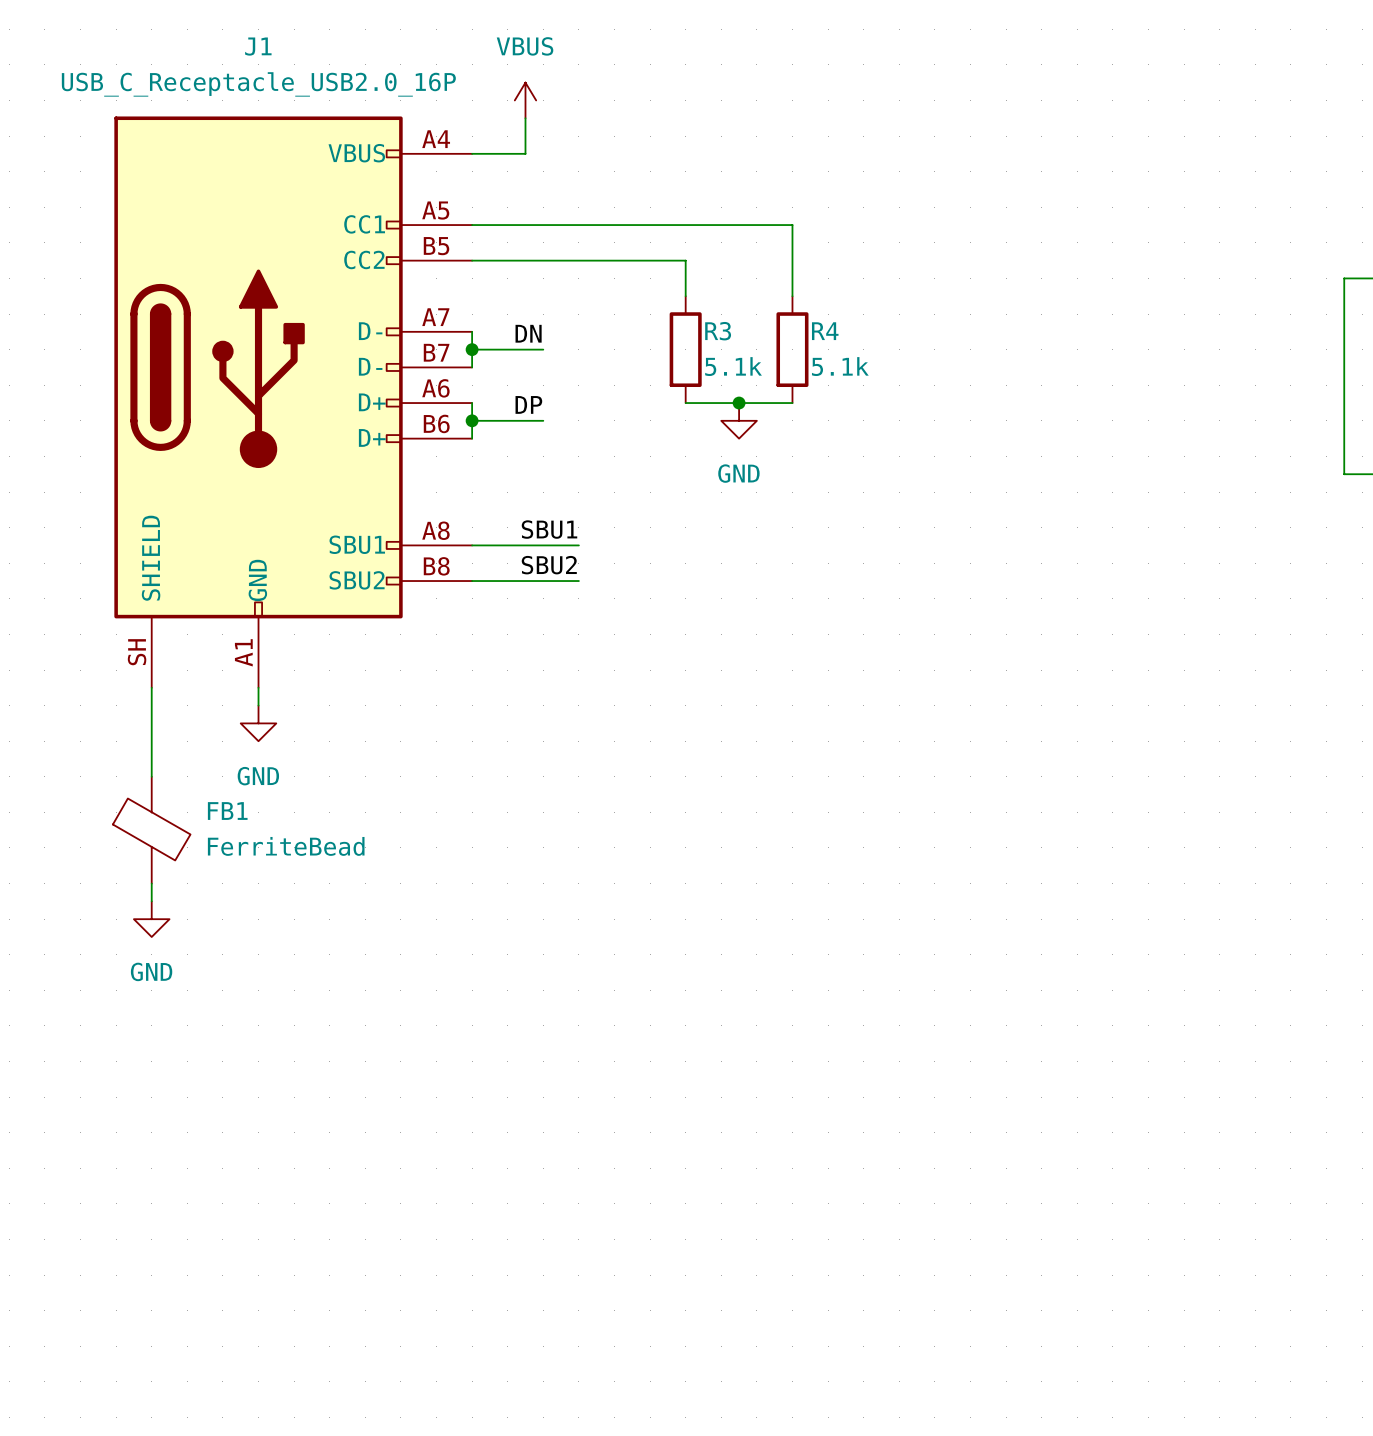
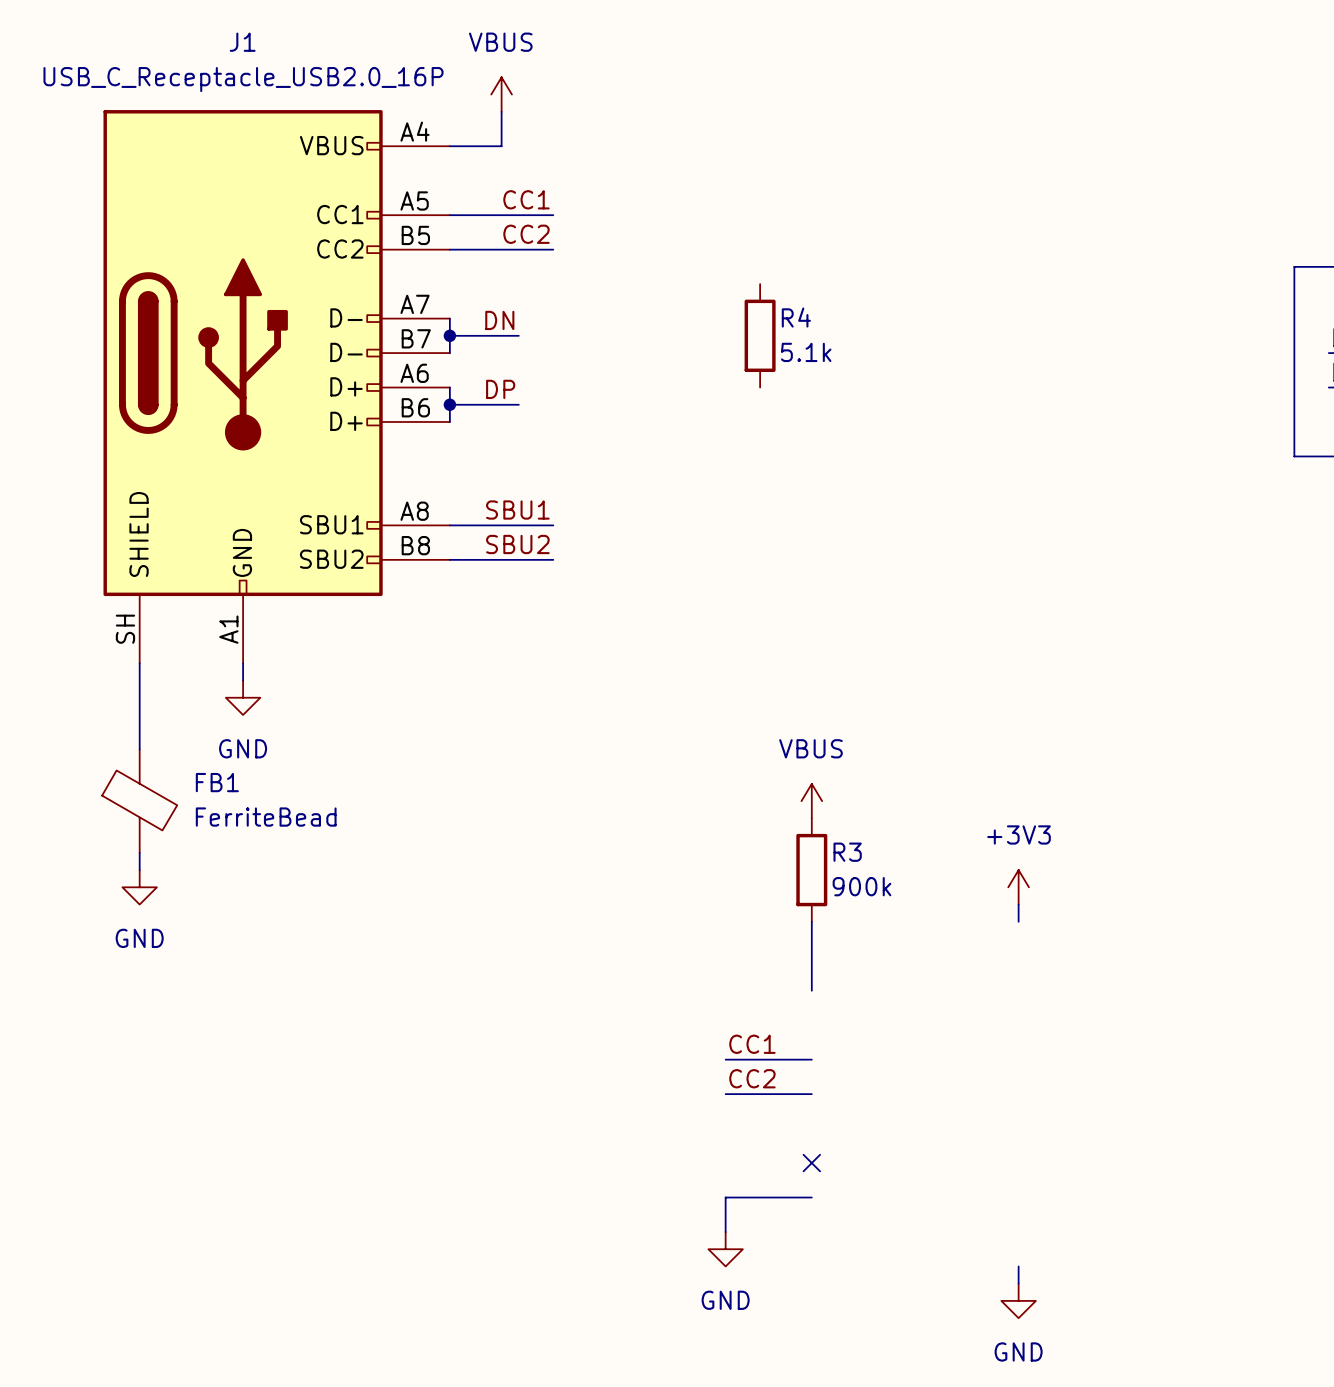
label: none -> CC1 (526, 199)
wire: (578, 225) (792, 225) (792, 296) -> none
label: none -> CC2 (526, 234)
wire: (578, 260) (685, 260) (685, 296) -> none
R3 position: (685, 349) -> (811, 870)
R3 value: 5.1k (733, 366) -> 900k (862, 886)
wire: (685, 403) (792, 403) -> none
junction: (739, 403) -> none
power symbol: GND (739, 420) -> none
power symbol: none -> VBUS (811, 801)
power symbol: none -> +3V3 (1018, 887)
wire: none -> (1018, 904) (1018, 921)
wire: none -> (811, 921) (811, 990)
label: none -> CC1 (752, 1044)
wire: none -> (725, 1059) (811, 1059)
label: none -> CC2 (752, 1078)
wire: none -> (725, 1094) (811, 1094)
no-connect mark: none -> (811, 1163)
wire: none -> (811, 1197) (725, 1197) (725, 1231)
power symbol: none -> GND (725, 1249)
wire: none -> (1018, 1266) (1018, 1283)
power symbol: none -> GND (1018, 1300)

